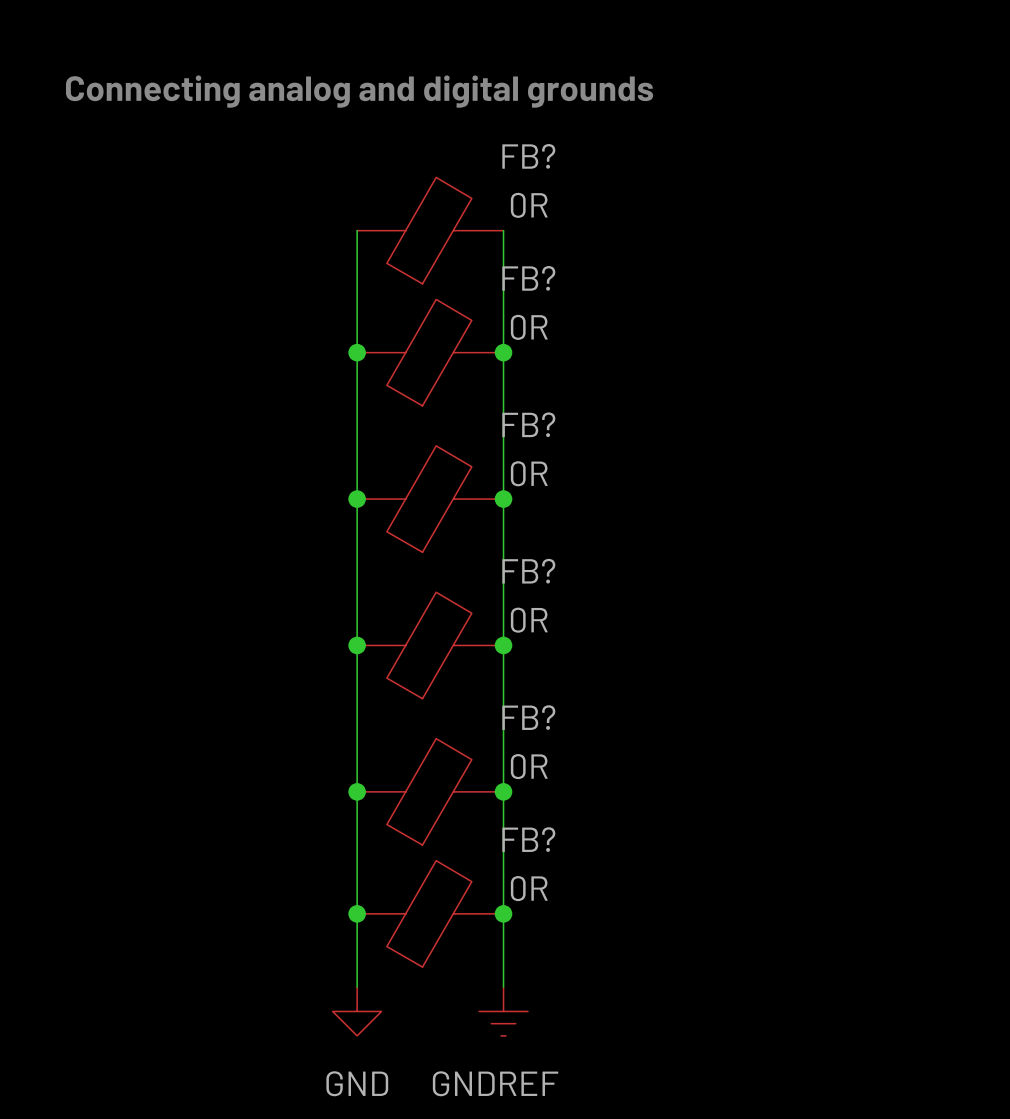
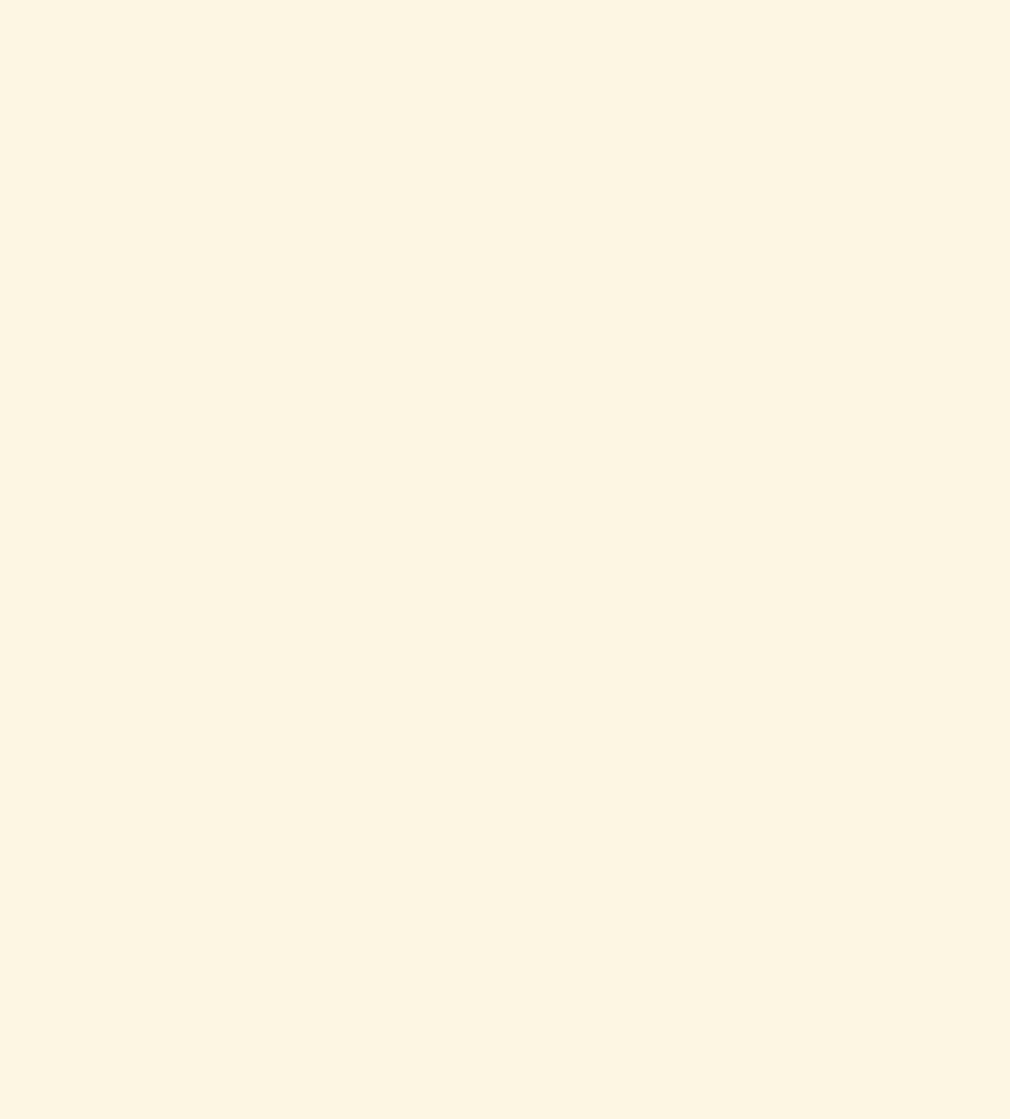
text: Connecting analog and digital grounds (359, 91) -> none
wire: (357, 230) (357, 987) -> none
FB?: 0R (430, 230) -> none
wire: (503, 230) (503, 987) -> none
junction: (357, 352) -> none
FB?: 0R (430, 352) -> none
junction: (503, 352) -> none
junction: (357, 499) -> none
FB?: 0R (430, 499) -> none
junction: (503, 499) -> none
junction: (357, 645) -> none
FB?: 0R (430, 645) -> none
junction: (503, 645) -> none
junction: (357, 791) -> none
FB?: 0R (430, 791) -> none
junction: (503, 791) -> none
junction: (357, 913) -> none
FB?: 0R (430, 913) -> none
junction: (503, 913) -> none
power symbol: GND (357, 1011) -> none
power symbol: GNDREF (503, 1011) -> none

